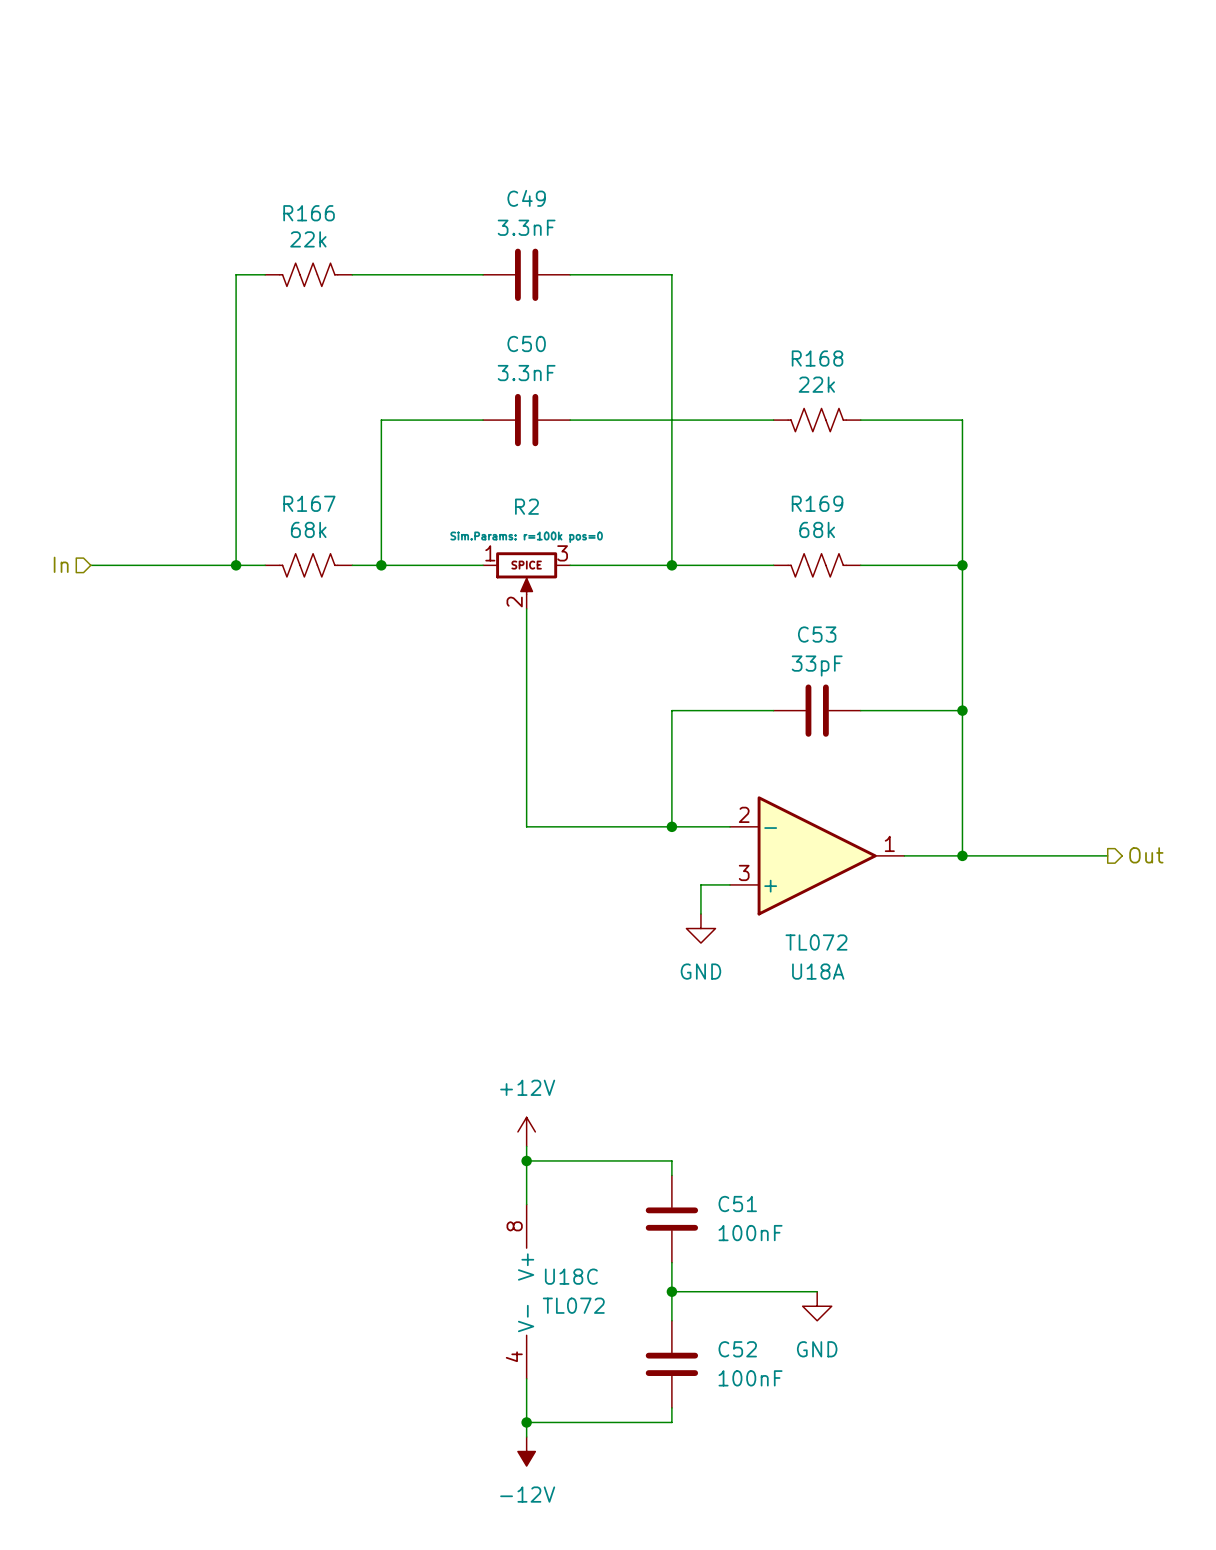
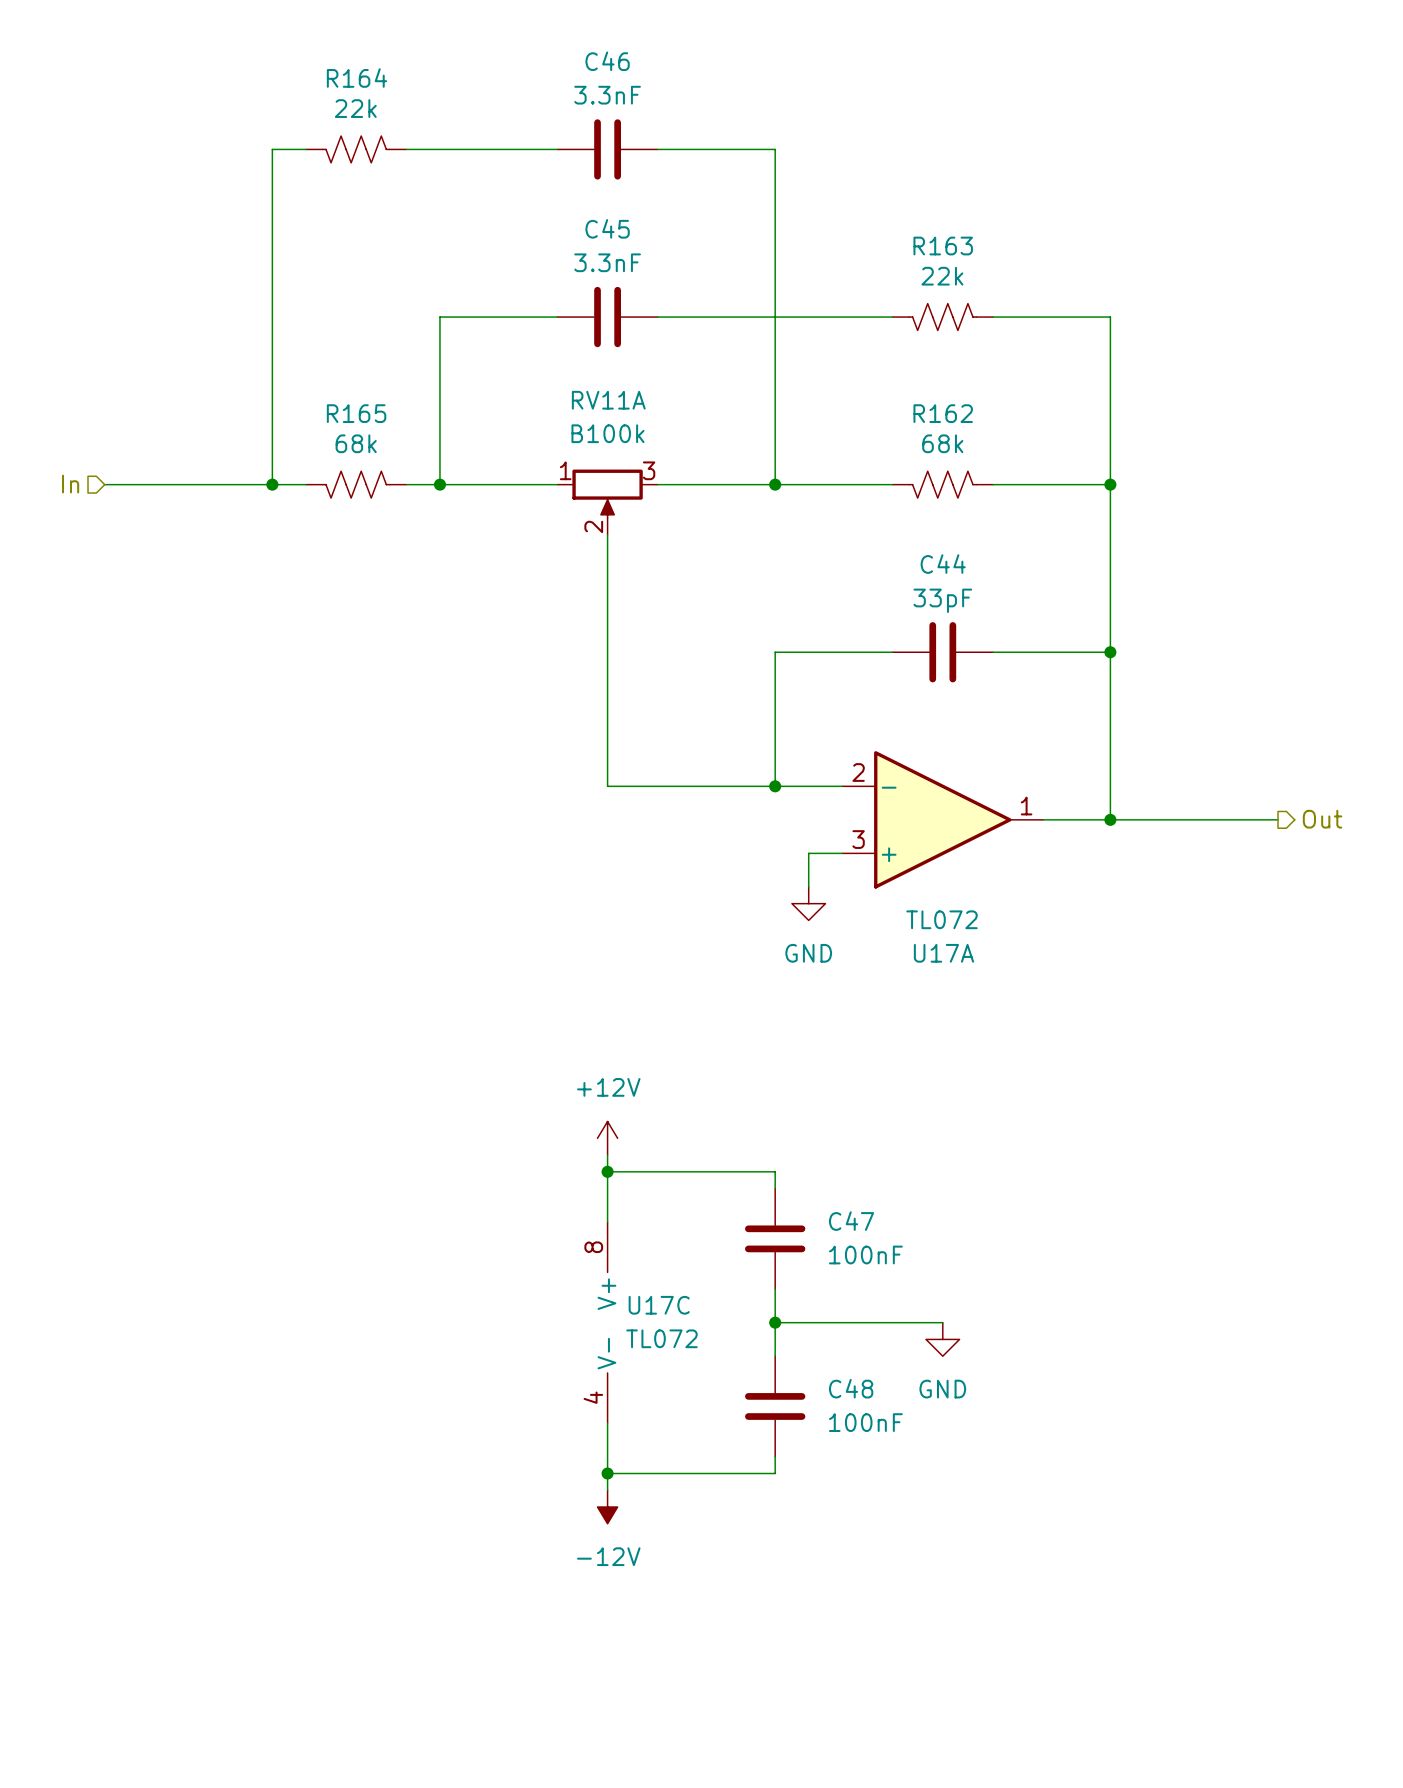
R164: none -> 22k (356, 149)
wire: none -> (406, 149) (557, 149)
C46: none -> 3.3nF (607, 149)
wire: none -> (657, 149) (775, 149) (775, 317) (892, 317)
C49 name: C49 (526, 198) -> C45 (607, 228)
wire: (236, 274) (265, 274) -> (272, 317) (272, 149) (305, 149)
R166: 22k (308, 274) -> none
wire: (352, 274) (381, 274) -> (406, 484) (439, 484) (439, 317)
R163: none -> 22k (942, 317)
wire: none -> (993, 317) (1110, 317) (1110, 484)
R168 name: R168 (817, 358) -> R162 (943, 413)
R168 value: 22k (816, 384) -> 68k (942, 443)
wire: (236, 420) (236, 565) -> none
junction: none -> (272, 484)
R165: none -> 68k (356, 484)
wire: (381, 420) (381, 565) -> (607, 534) (607, 702)
junction: none -> (439, 484)
C50: 3.3nF (526, 420) -> none
wire: (671, 420) (671, 565) (570, 565) -> none
junction: none -> (775, 484)
junction: none -> (1110, 484)
RV11A: none -> B100k (607, 502)
hierarchical label position: In (61, 564) -> In (70, 484)
wire: (90, 565) (265, 565) -> (104, 484) (305, 484)
junction: (236, 565) -> none
R167: 68k (308, 565) -> none
wire: (352, 565) (483, 565) -> none
junction: (381, 565) -> none
wire: none -> (775, 652) (775, 786)
junction: (671, 565) -> none
R169: 68k (817, 565) -> none
C44: none -> 33pF (942, 652)
R2: (526, 580) -> none
wire: (526, 681) (526, 826) (730, 826) -> (607, 786) (842, 786)
junction: none -> (775, 786)
wire: (773, 710) (671, 710) (671, 826) -> none
C53: 33pF (817, 710) -> none
U17A: none -> TL072 (942, 819)
wire: (962, 710) (962, 855) -> (1110, 819) (1278, 819)
power symbol: none -> GND (808, 903)
junction: (671, 826) -> none
U18A: TL072 (817, 855) -> none
wire: (904, 855) (1107, 855) -> none
junction: (962, 855) -> none
hierarchical label position: Out (1146, 855) -> Out (1322, 819)
wire: (730, 884) (700, 884) (700, 914) -> (842, 853) (808, 853) (808, 886)
power symbol: GND (700, 928) -> none
wire: none -> (607, 1171) (775, 1171) (775, 1188)
junction: none -> (607, 1171)
C47: none -> 100nF (775, 1238)
power symbol position: +12V (526, 1131) -> +12V (607, 1138)
wire: (526, 1146) (526, 1204) -> (607, 1155) (607, 1222)
U17C: none -> TL072 (607, 1322)
junction: none -> (775, 1322)
wire: (526, 1160) (671, 1160) -> (775, 1289) (775, 1339)
junction: (526, 1160) -> none
power symbol: none -> GND (942, 1339)
C51 name: C51 (737, 1204) -> C48 (851, 1388)
junction: none -> (607, 1473)
wire: (671, 1277) (671, 1320) -> (775, 1473) (607, 1473)
U18C: TL072 (526, 1291) -> none
wire: (671, 1291) (817, 1291) -> (775, 1322) (942, 1322)
junction: (671, 1291) -> none
power symbol: GND (817, 1306) -> none
C52: 100nF (671, 1364) -> none
wire: (526, 1378) (526, 1436) -> (607, 1423) (607, 1490)
wire: (671, 1407) (671, 1422) (526, 1422) -> none
junction: (526, 1422) -> none
power symbol position: -12V (526, 1451) -> -12V (607, 1507)

